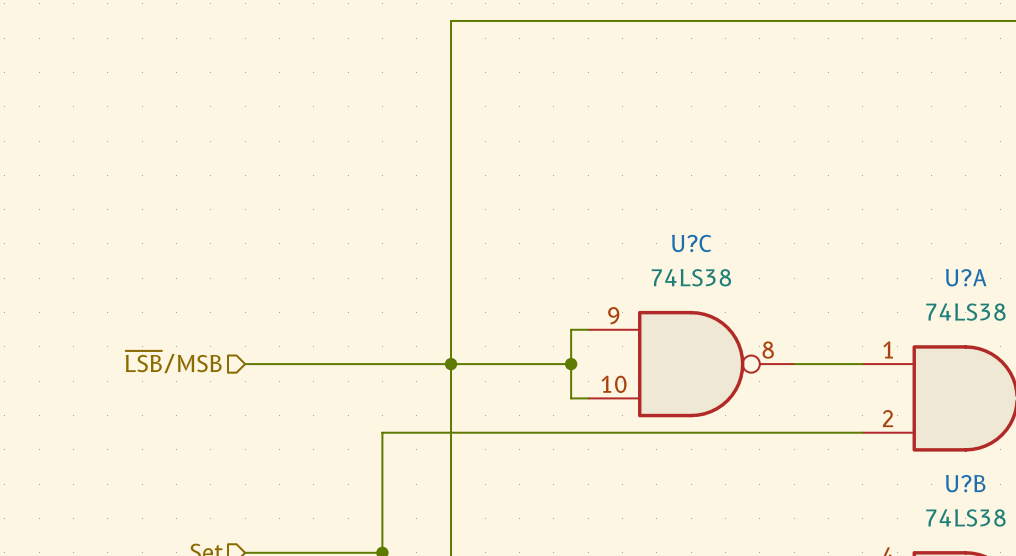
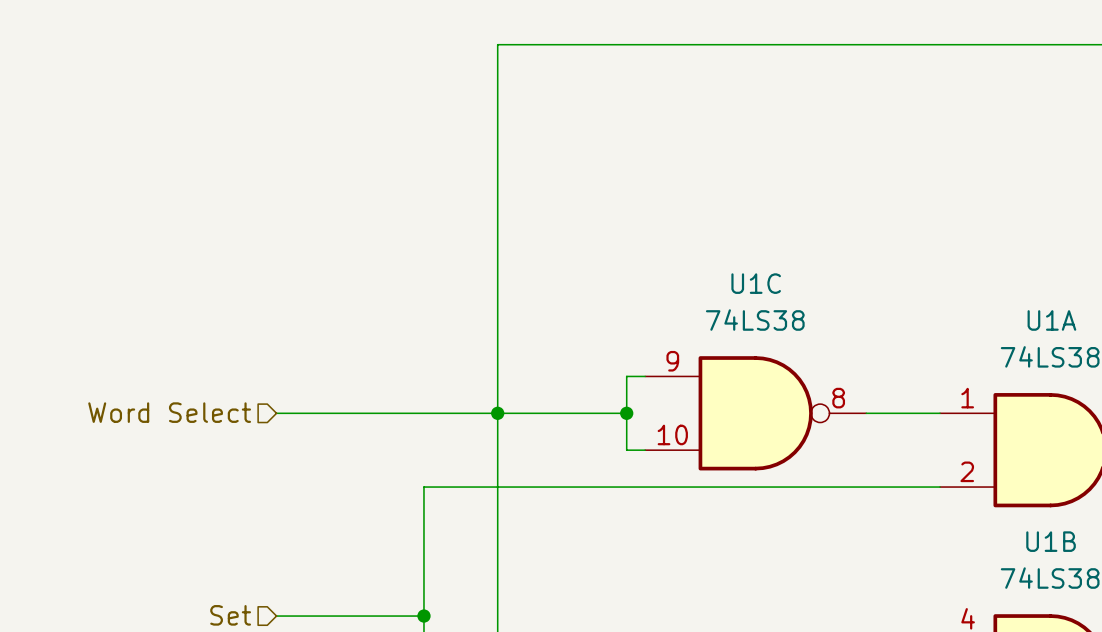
U?C name: U?C (691, 243) -> U1C (756, 283)
U?A name: U?A (966, 277) -> U1A (1051, 320)
hierarchical label: ~{LSB}/MSB (173, 362) -> Word Select (169, 412)
U?B name: U?B (965, 483) -> U1B (1051, 541)

